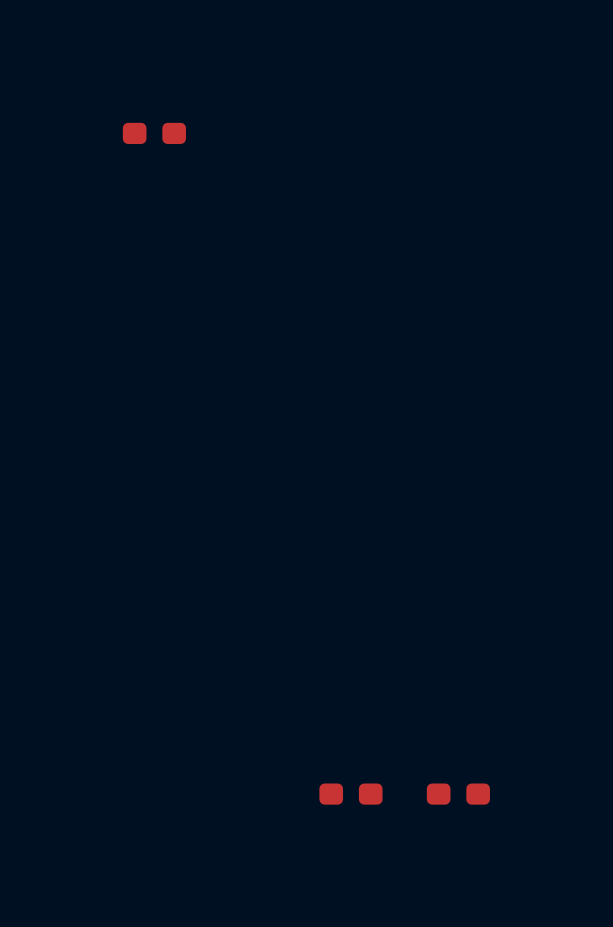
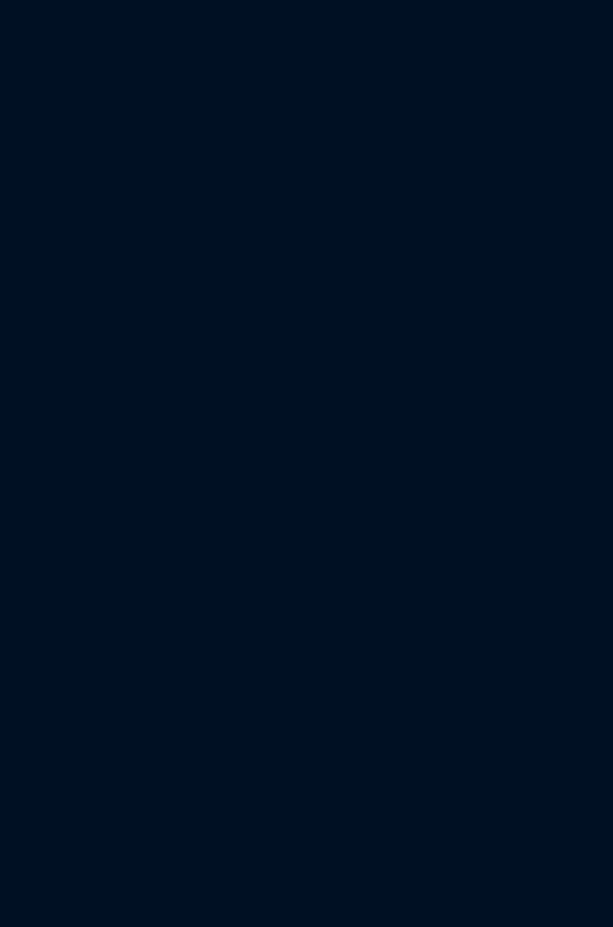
part: (154, 133) -> none
part: (350, 794) -> none
part: (458, 794) -> none

